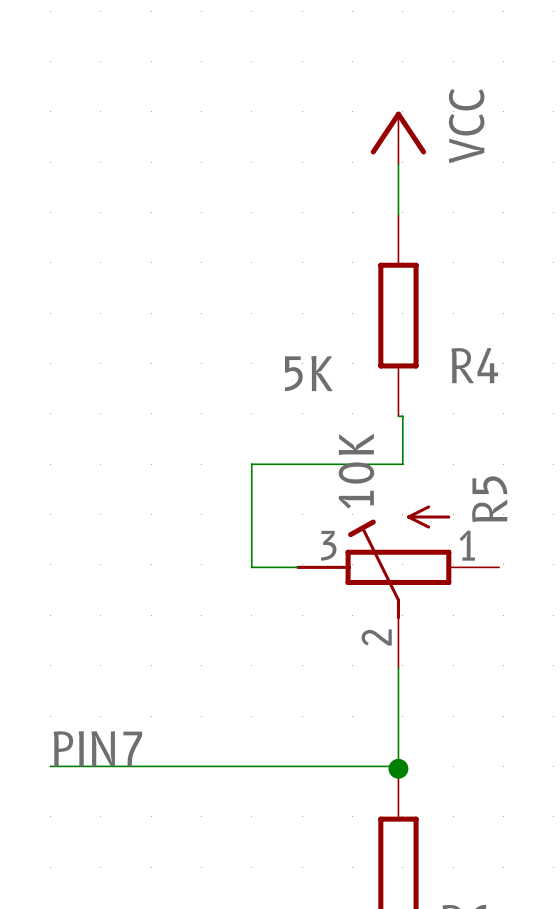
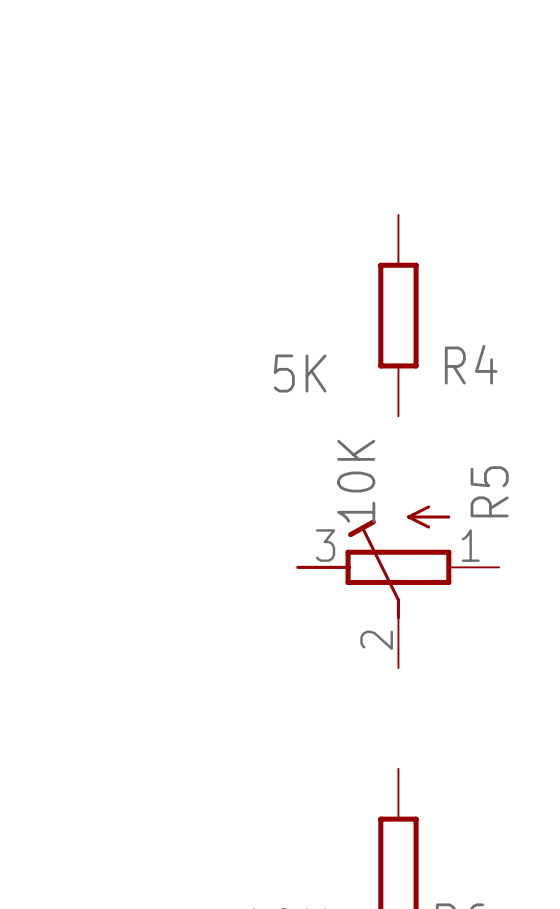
power symbol: VCC (398, 138) -> none
wire: (398, 164) (398, 214) -> none
wire: (398, 416) (402, 416) (402, 464) (251, 464) (251, 567) (297, 567) -> none
wire: (398, 668) (398, 768) -> none
label: PIN7 (97, 748) -> none
wire: (50, 766) (398, 766) -> none
junction: (398, 768) -> none

